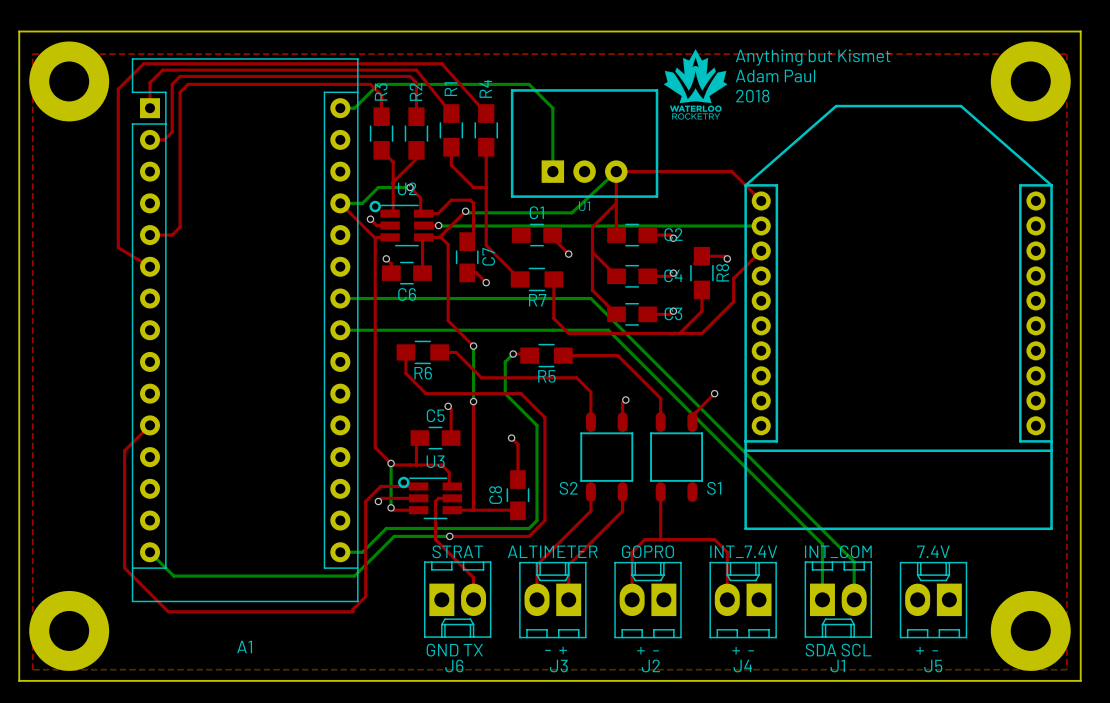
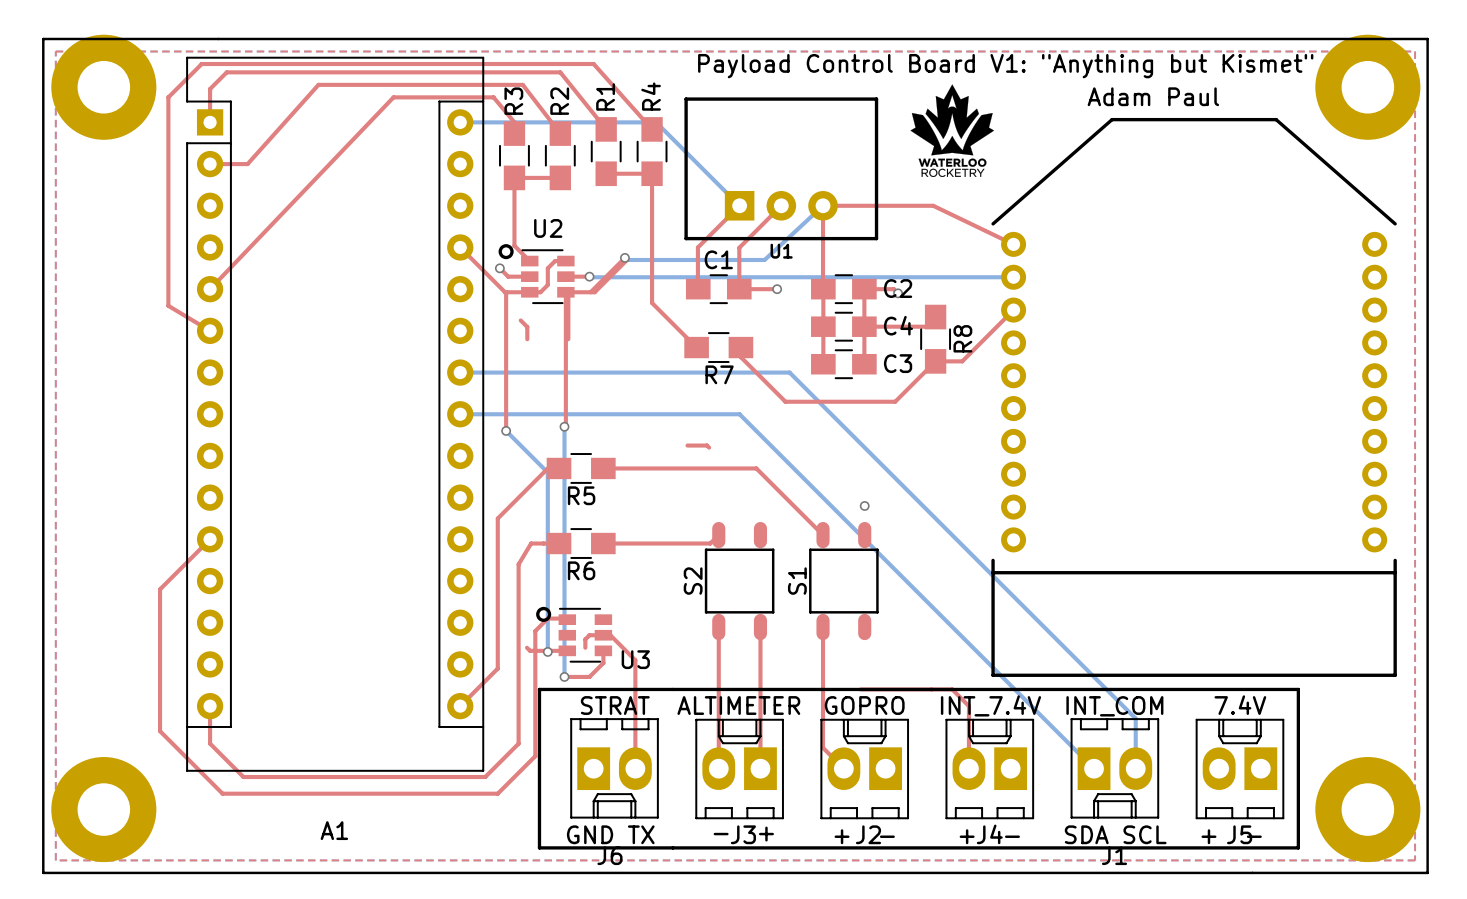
board edge: (19, 31) (19, 680) (1080, 680) (1080, 31) (19, 31) -> (43, 38) (43, 872) (1427, 872) (1427, 38) (43, 38)
text: Anything but Kismet (813, 57) -> none
text: none -> Payload Control Board V1: "Anything but Kismet" (1005, 66)
text position: Adam Paul (775, 76) -> Adam Paul (1153, 96)
drawing position: (695, 84) -> (952, 130)
text: 2018 (752, 96) -> none
part footprint: [744, 104, 1053, 531] -> [991, 117, 1397, 677]
bottom track: (354, 108) (378, 84) (529, 84) (552, 108) (552, 171) -> (479, 122) (656, 122) (739, 205)
top track: (381, 108) (381, 95) (370, 84) (188, 84) (180, 92) (180, 227) (172, 235) (150, 235) -> (514, 122) (493, 97) (393, 97) (210, 289)
top track: (416, 116) (416, 82) (410, 76) (180, 76) (172, 84) (172, 131) (164, 139) -> (560, 133) (522, 84) (318, 84) (247, 164) (228, 164)
top track: (451, 147) (451, 165) (473, 187) (486, 187) -> (606, 173) (652, 173)
top track: (381, 150) (393, 162) (393, 213) -> none
top track: (416, 150) (416, 158) (393, 182) -> (560, 177) (514, 177) (514, 245) (529, 261)
top track: none -> (739, 205) (697, 247) (697, 289)
top track: none -> (781, 205) (739, 247) (739, 289) (777, 289)
top track: (700, 171) (731, 171) (761, 200) -> (933, 205) (1013, 244)
top track: (410, 187) (420, 198) (420, 213) -> (529, 292) (540, 292) (547, 285) (547, 268) (555, 261) (565, 261)
bottom track: (410, 187) (378, 187) (362, 203) (340, 203) -> none
via: (410, 187) -> none
top track: (616, 203) (592, 227) (592, 290) (616, 314) -> none
U2 footprint: [380, 204, 434, 247] -> [521, 249, 575, 305]
top track: (423, 213) (437, 213) (451, 200) (470, 200) (473, 203) (473, 235) (467, 241) -> none
top track: (552, 235) (552, 237) (568, 254) -> none
top track: none -> (823, 289) (823, 364)
top track: none -> (864, 289) (864, 364)
top track: none -> (565, 292) (564, 426)
top track: (441, 237) (448, 244) (448, 320) (473, 346) -> (592, 292) (627, 259)
top track: (592, 252) (616, 276) -> none
via position: (568, 254) -> (777, 289)
top track: (701, 256) (724, 256) (727, 258) -> none
C7: (467, 257) -> none
via: (386, 258) -> none
via: (727, 258) -> none
top track: none -> (864, 326) (925, 326)
top track: (467, 272) (476, 272) (486, 282) -> none
C6: (406, 273) -> none
top track: (673, 273) (670, 276) (647, 276) -> none
via: (673, 273) -> none
C4 position: (632, 276) -> (843, 326)
top track: (733, 278) (733, 301) (701, 333) (568, 333) (553, 318) (553, 286) -> (977, 346) (962, 361) (935, 361) (895, 401) (785, 401) (740, 357)
via: (486, 282) -> none
top track: (701, 289) (701, 311) (679, 333) -> none
top track: (673, 311) (670, 314) (647, 314) -> none
via: (673, 311) -> none
C3 position: (632, 314) -> (843, 364)
bottom track: (552, 330) (608, 330) (822, 544) (822, 599) -> (739, 414) (1094, 768)
bottom track: none -> (564, 426) (564, 676)
via: none -> (564, 426)
top track: (375, 342) (375, 447) (392, 465) (441, 465) (449, 472) (449, 486) -> none
bottom track: none -> (506, 430) (547, 472) (547, 651)
via: none -> (506, 430)
bottom track: (473, 346) (473, 401) -> none
via: (473, 346) -> none
top track: (405, 352) (405, 373) (425, 393) (521, 393) (544, 417) (544, 520) (529, 536) (449, 536) -> none
R6 position: (422, 352) -> (581, 543)
top track: (439, 352) (456, 352) (481, 377) (576, 377) (590, 392) (590, 422) -> none
bottom track: (513, 354) (505, 361) (505, 393) (536, 425) (536, 520) (529, 528) (386, 528) (362, 552) (340, 552) -> none
via: (513, 354) -> none
R5 position: (546, 355) -> (581, 468)
top track: (563, 355) (617, 355) (660, 398) (660, 422) -> none
top track: none -> (559, 468) (547, 468) (497, 518) (497, 668) (460, 706)
top track: none -> (603, 468) (756, 468) (823, 535)
top track: (714, 393) (692, 415) (692, 422) -> none
via: (714, 393) -> none
top track: (625, 400) (622, 403) (622, 422) -> none
via position: (625, 400) -> (864, 505)
top track: (473, 401) (473, 510) -> none
via: (473, 401) -> none
top track: (448, 406) (451, 409) (451, 438) -> none
via: (448, 406) -> none
top track: none -> (718, 535) (710, 543) (603, 543)
top track: none -> (559, 543) (531, 543) (518, 564) (518, 743) (485, 777) (243, 777) (210, 743) (210, 706)
top track: (419, 438) (416, 441) (416, 465) -> none
C5: (435, 438) -> none
top track: (511, 438) (517, 444) (517, 479) -> none
via: (511, 438) -> none
top track: (124, 450) (124, 568) (168, 611) (353, 611) (353, 609) (365, 596) (365, 501) (380, 486) (421, 486) -> (176, 572) (160, 589) (160, 731) (222, 793) (497, 793) (535, 756) (535, 631) (547, 618) (568, 618)
part: none -> (739, 581)
part: (606, 457) -> none
part: none -> (843, 581)
part: (676, 457) -> none
U3 name position: U3 (435, 461) -> U3 (635, 659)
bottom track: (391, 463) (391, 507) -> none
via: (391, 463) -> none
U3 footprint: [408, 477, 463, 520] -> [558, 607, 613, 663]
text rotation: 0° (568, 488) -> 90° counterclockwise (693, 581)
text position: S2 (568, 488) -> S2 (693, 581)
text rotation: 0° (714, 488) -> 90° counterclockwise (797, 581)
text position: S1 (714, 488) -> S1 (797, 581)
top track: (590, 492) (590, 511) (536, 564) -> (718, 627) (718, 722)
top track: (622, 492) (622, 511) (568, 564) -> (760, 627) (760, 722)
C8: (517, 495) -> none
top track: (657, 495) (660, 492) (660, 539) -> none
top track: (418, 498) (381, 498) (378, 501) -> none
via: (378, 501) -> none
via: (391, 507) -> none
top track: (435, 507) (435, 539) (473, 577) -> (610, 635) (635, 660) (635, 739)
top track: none -> (603, 650) (603, 663) (589, 676) (564, 676)
top track: (452, 510) (517, 510) -> none
via: none -> (547, 651)
via: none -> (564, 676)
bottom track: (449, 536) (394, 536) (354, 576) (173, 576) (150, 552) -> none
via: (449, 536) -> none
line: none -> (539, 689) (539, 847) (1298, 847) (1298, 689) (539, 689)
top track: (644, 539) (632, 552) (632, 599) -> (823, 627) (823, 747) (843, 768)
J2 name position: J2 (650, 665) -> J2 (868, 834)
J3 name position: J3 (558, 666) -> J3 (743, 834)
J4 name position: J4 (742, 666) -> J4 (989, 834)
J5 name position: J5 (933, 666) -> J5 (1239, 834)

